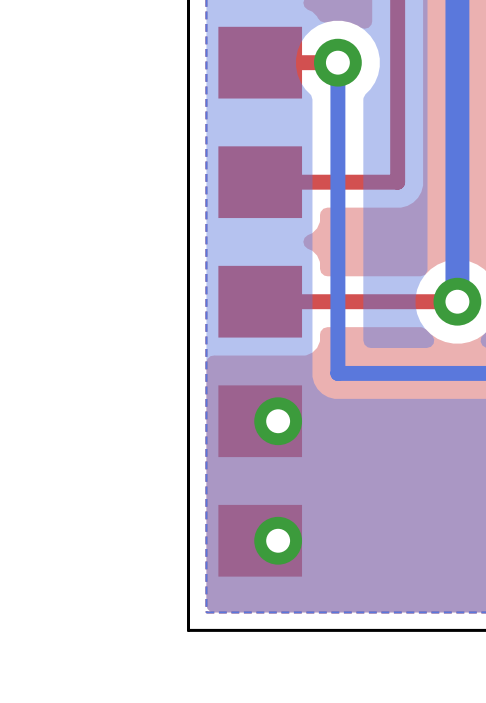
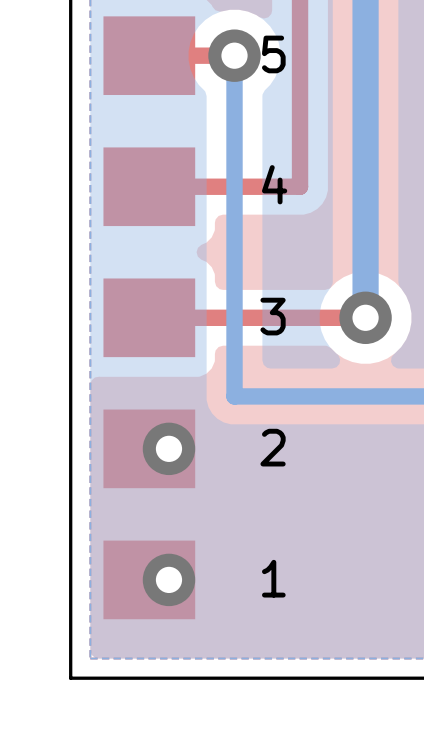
text: none -> 5 (273, 54)
text: none -> 4 (274, 184)
text: none -> 3 (273, 316)
text: none -> 2 (273, 447)
text: none -> 1 (273, 578)

